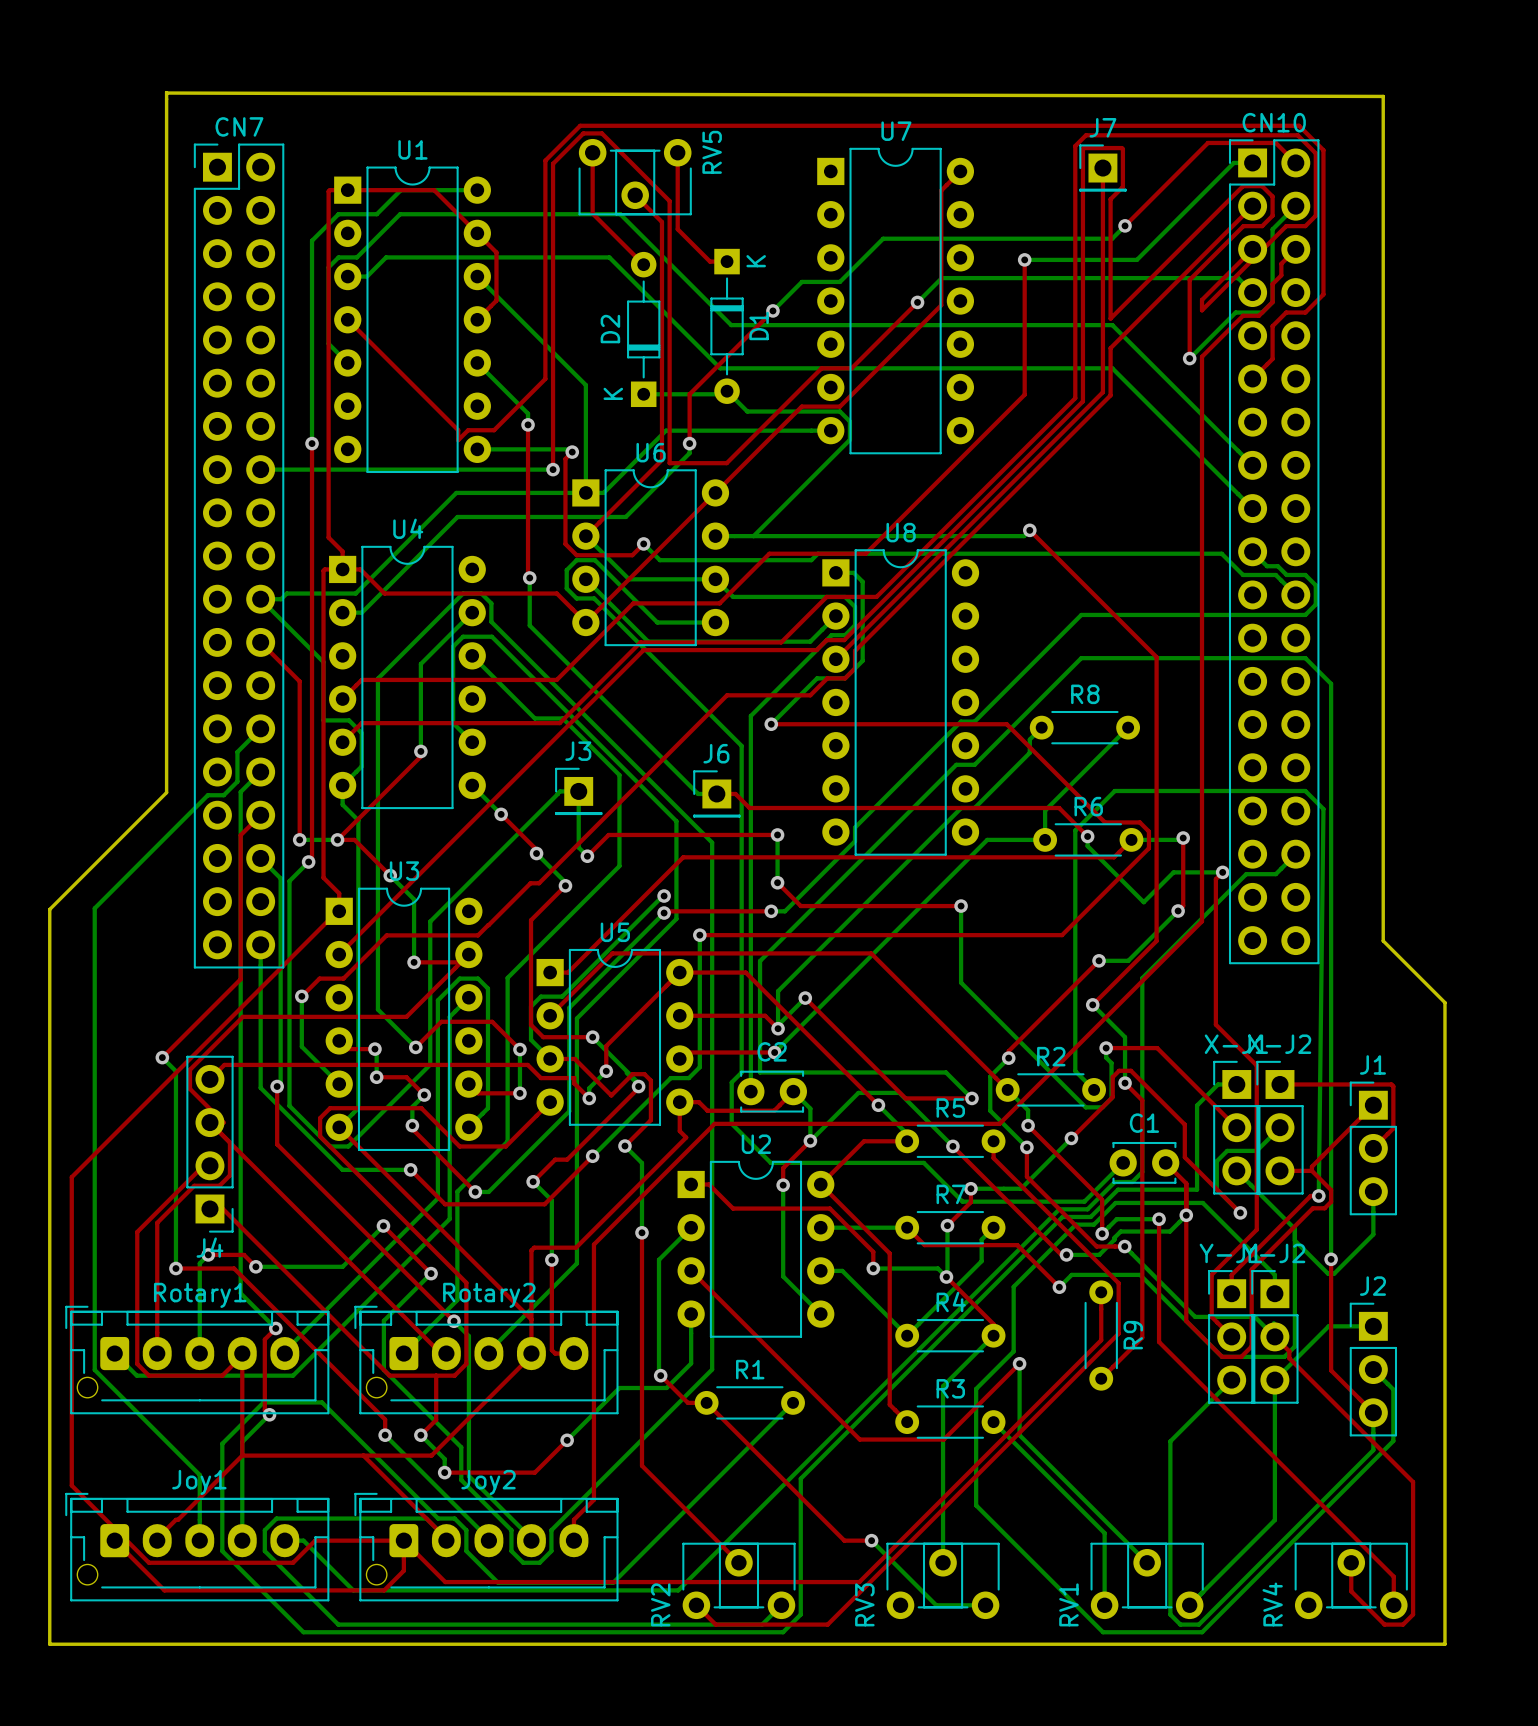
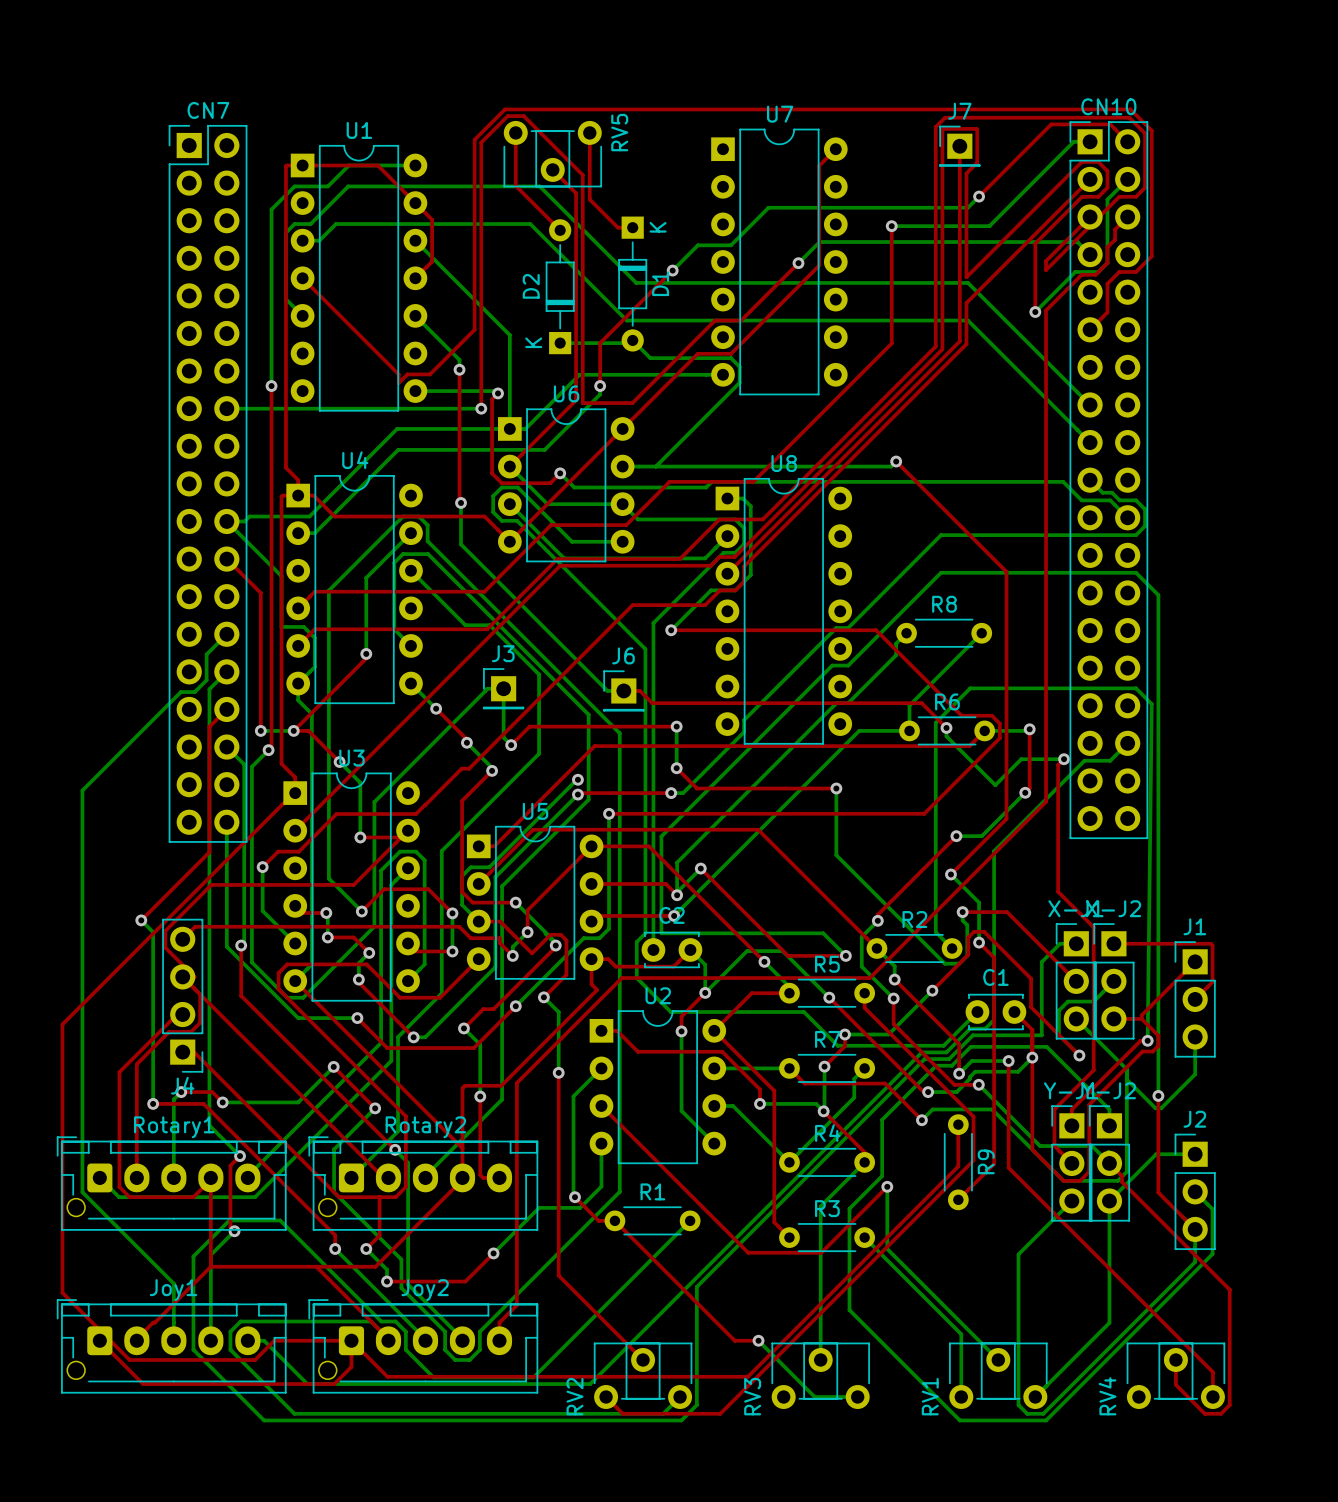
board edge: (166, 93) (1383, 96) (1383, 940) (1444, 1002) (1444, 1644) (49, 1644) (49, 909) (166, 792) (166, 92) (166, 93) -> none

